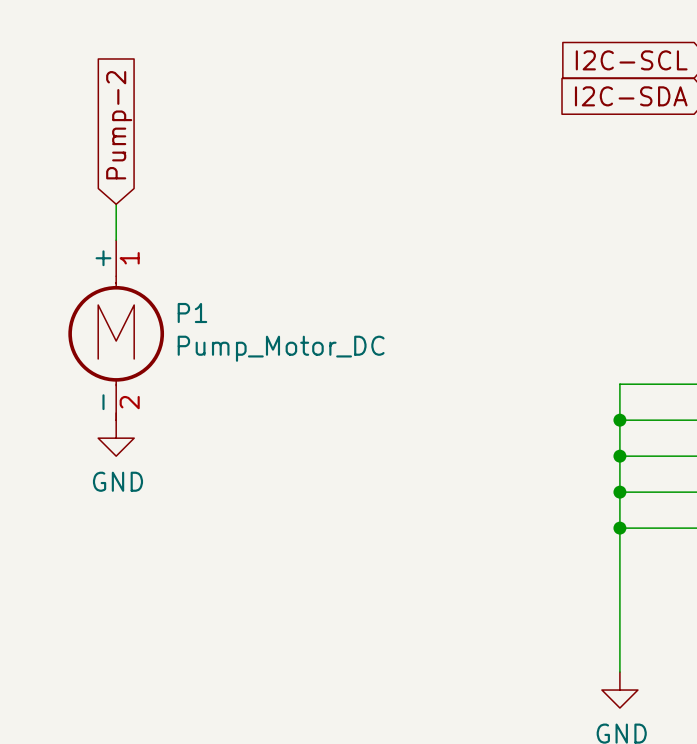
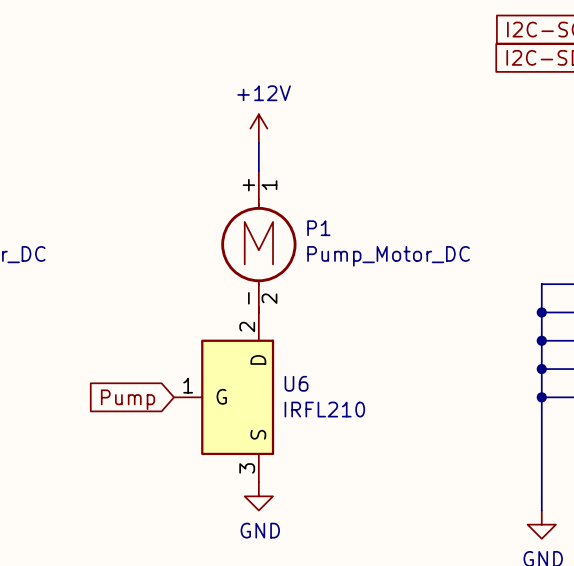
global label: Pump-2 (119, 125) -> none
power symbol: none -> +12V (258, 128)
wire: (116, 204) (116, 240) -> (258, 142) (258, 171)
P1 position: (116, 330) -> (258, 241)
power symbol position: GND (116, 438) -> GND (258, 496)
U6: none -> IRFL210 (224, 397)
global label: none -> Pump (128, 399)

